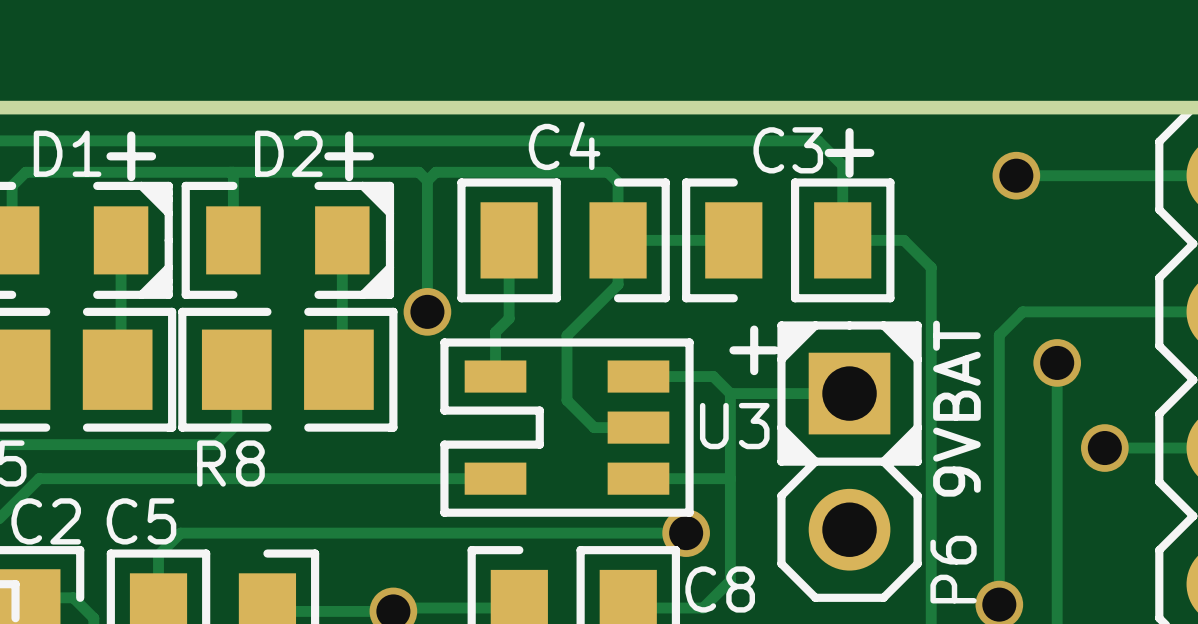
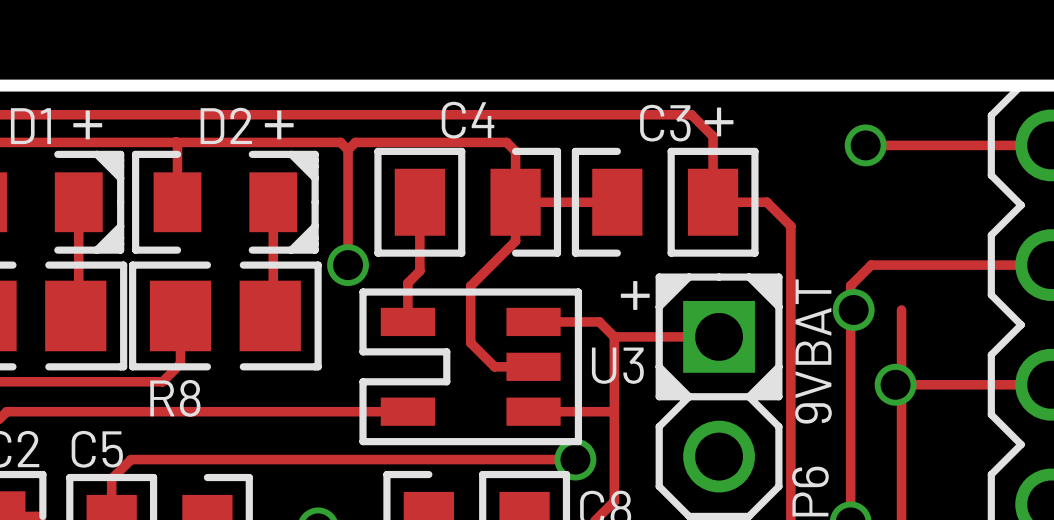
via: none -> (853, 309)
via: (1057, 362) -> none
track: none -> (895, 384) (943, 384)
via: none -> (895, 384)
via: (1104, 448) -> none

